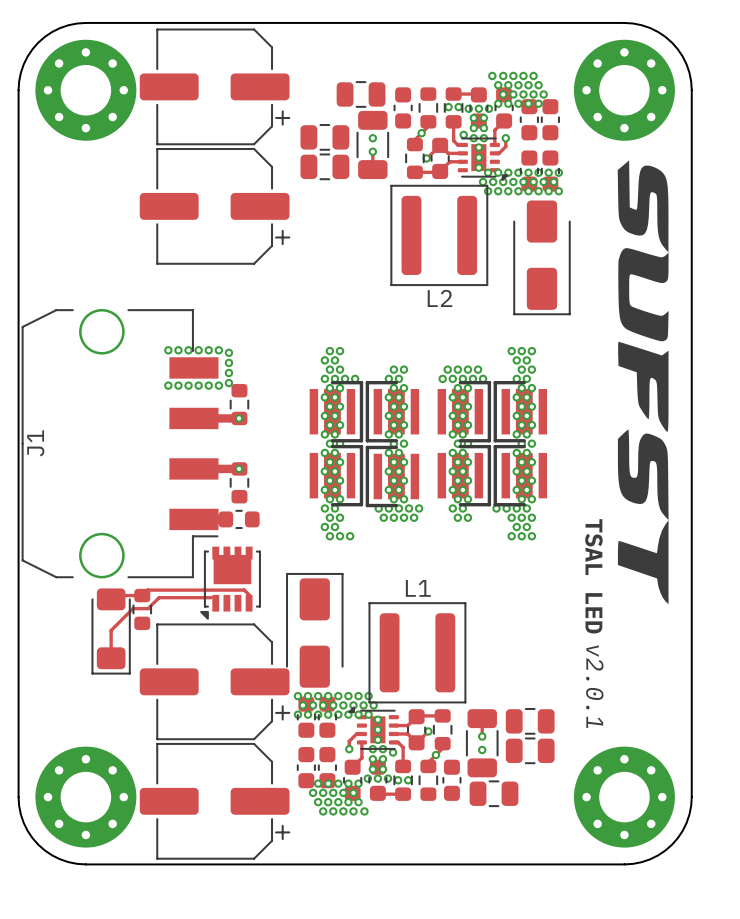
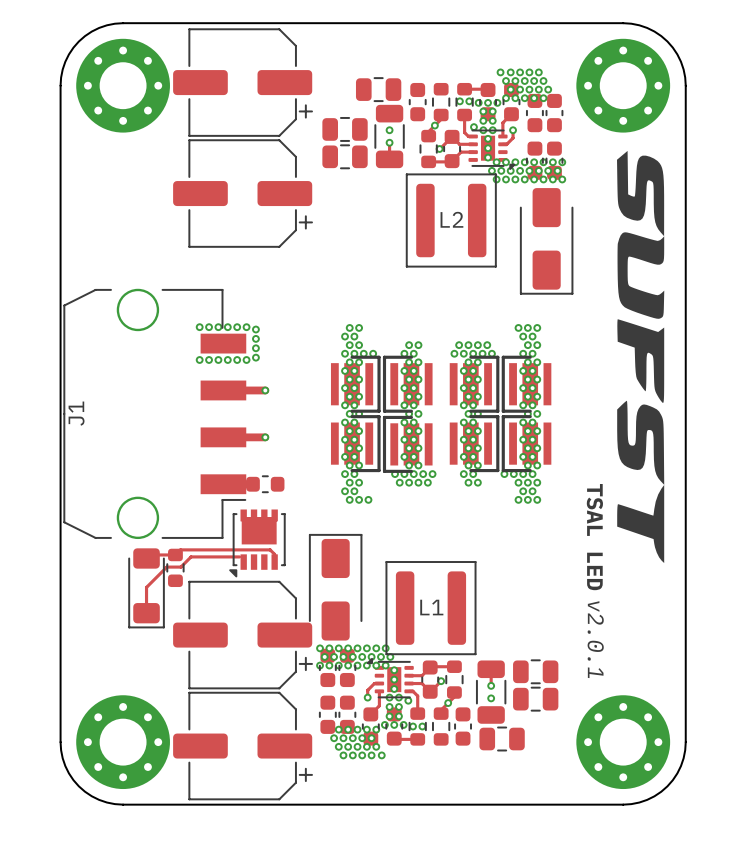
L2 name position: L2 (440, 298) -> L2 (451, 219)
part: (239, 404) -> none
part: (239, 482) -> none
L1 name position: L1 (418, 588) -> L1 (431, 607)

